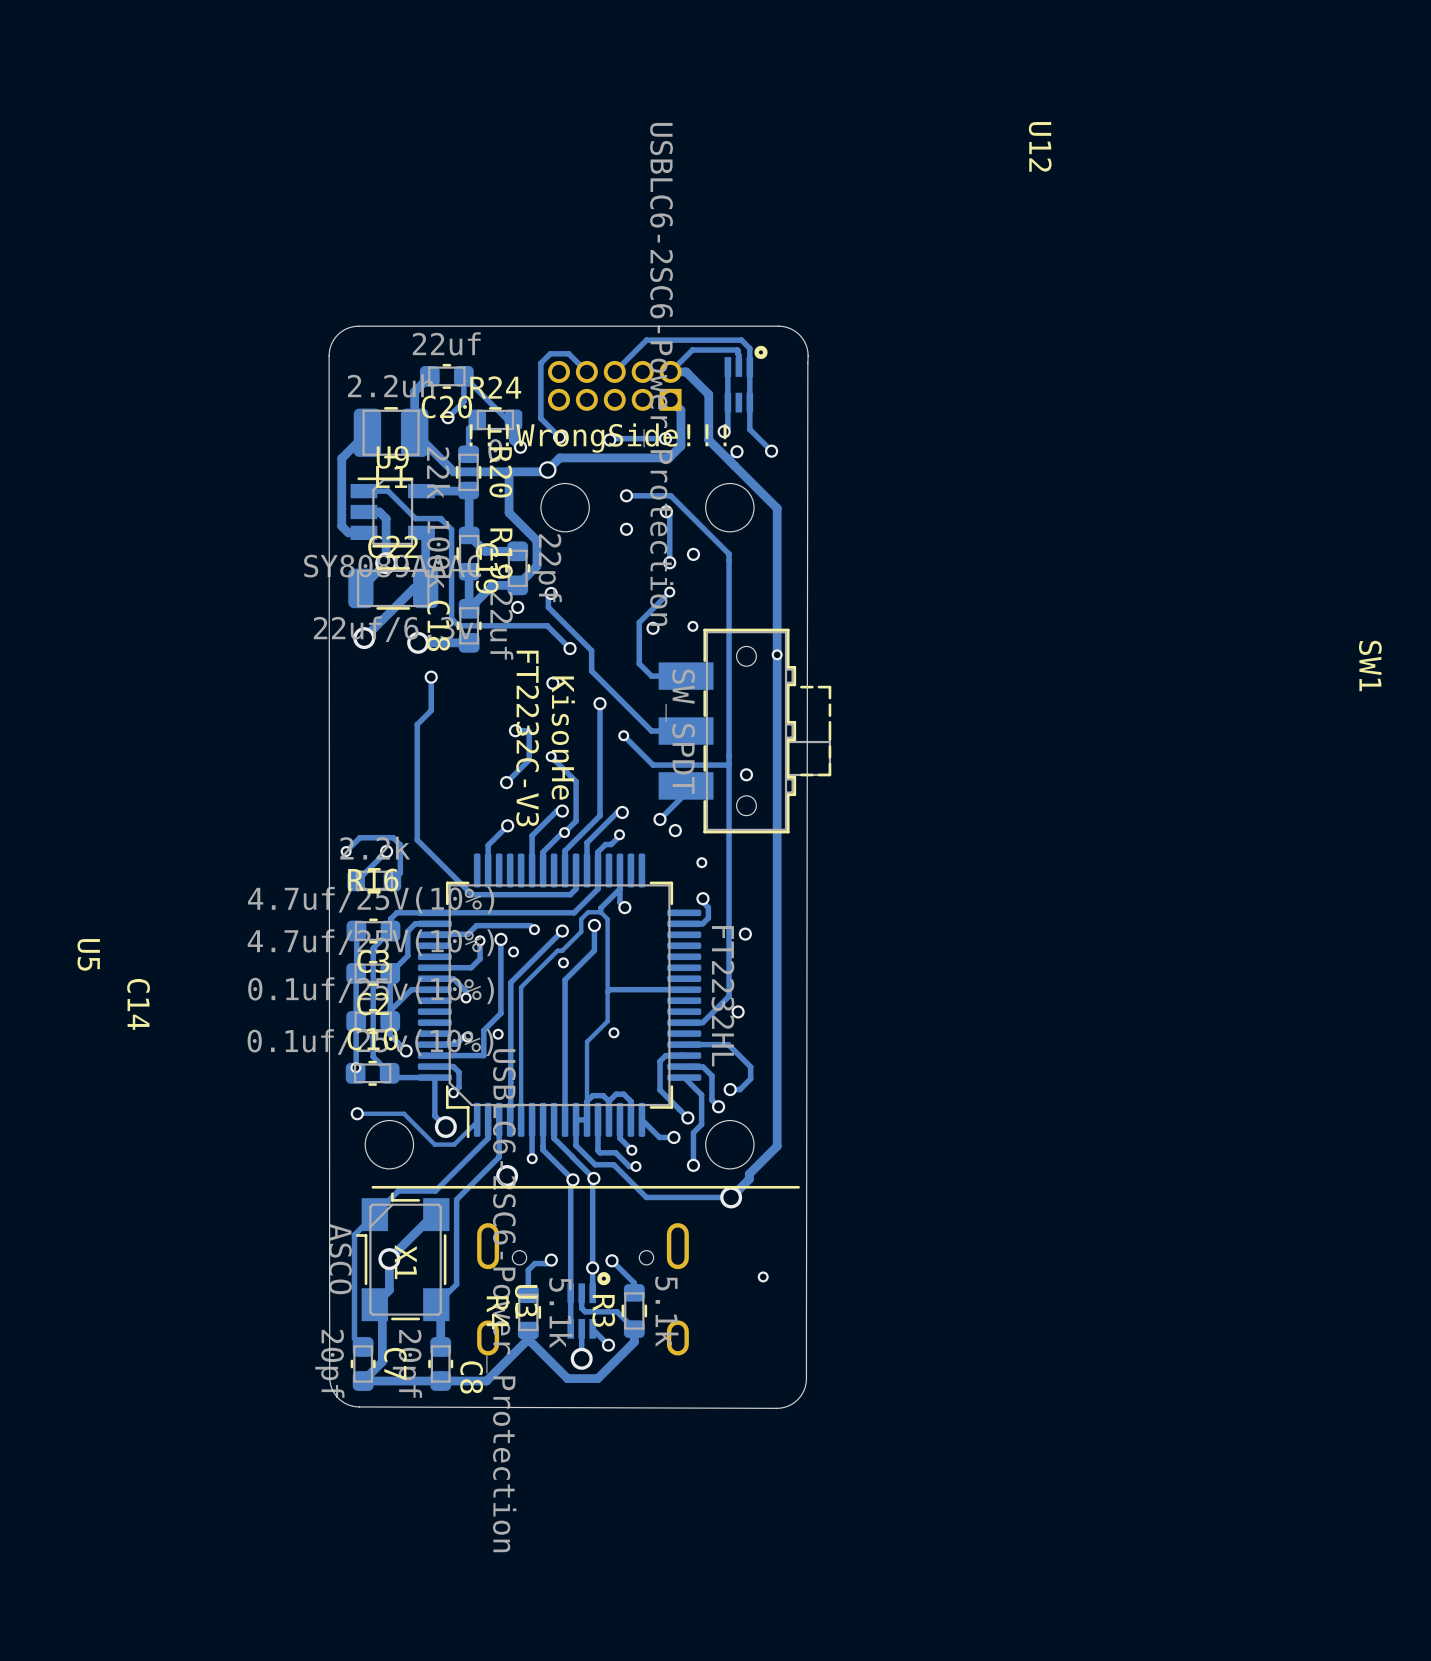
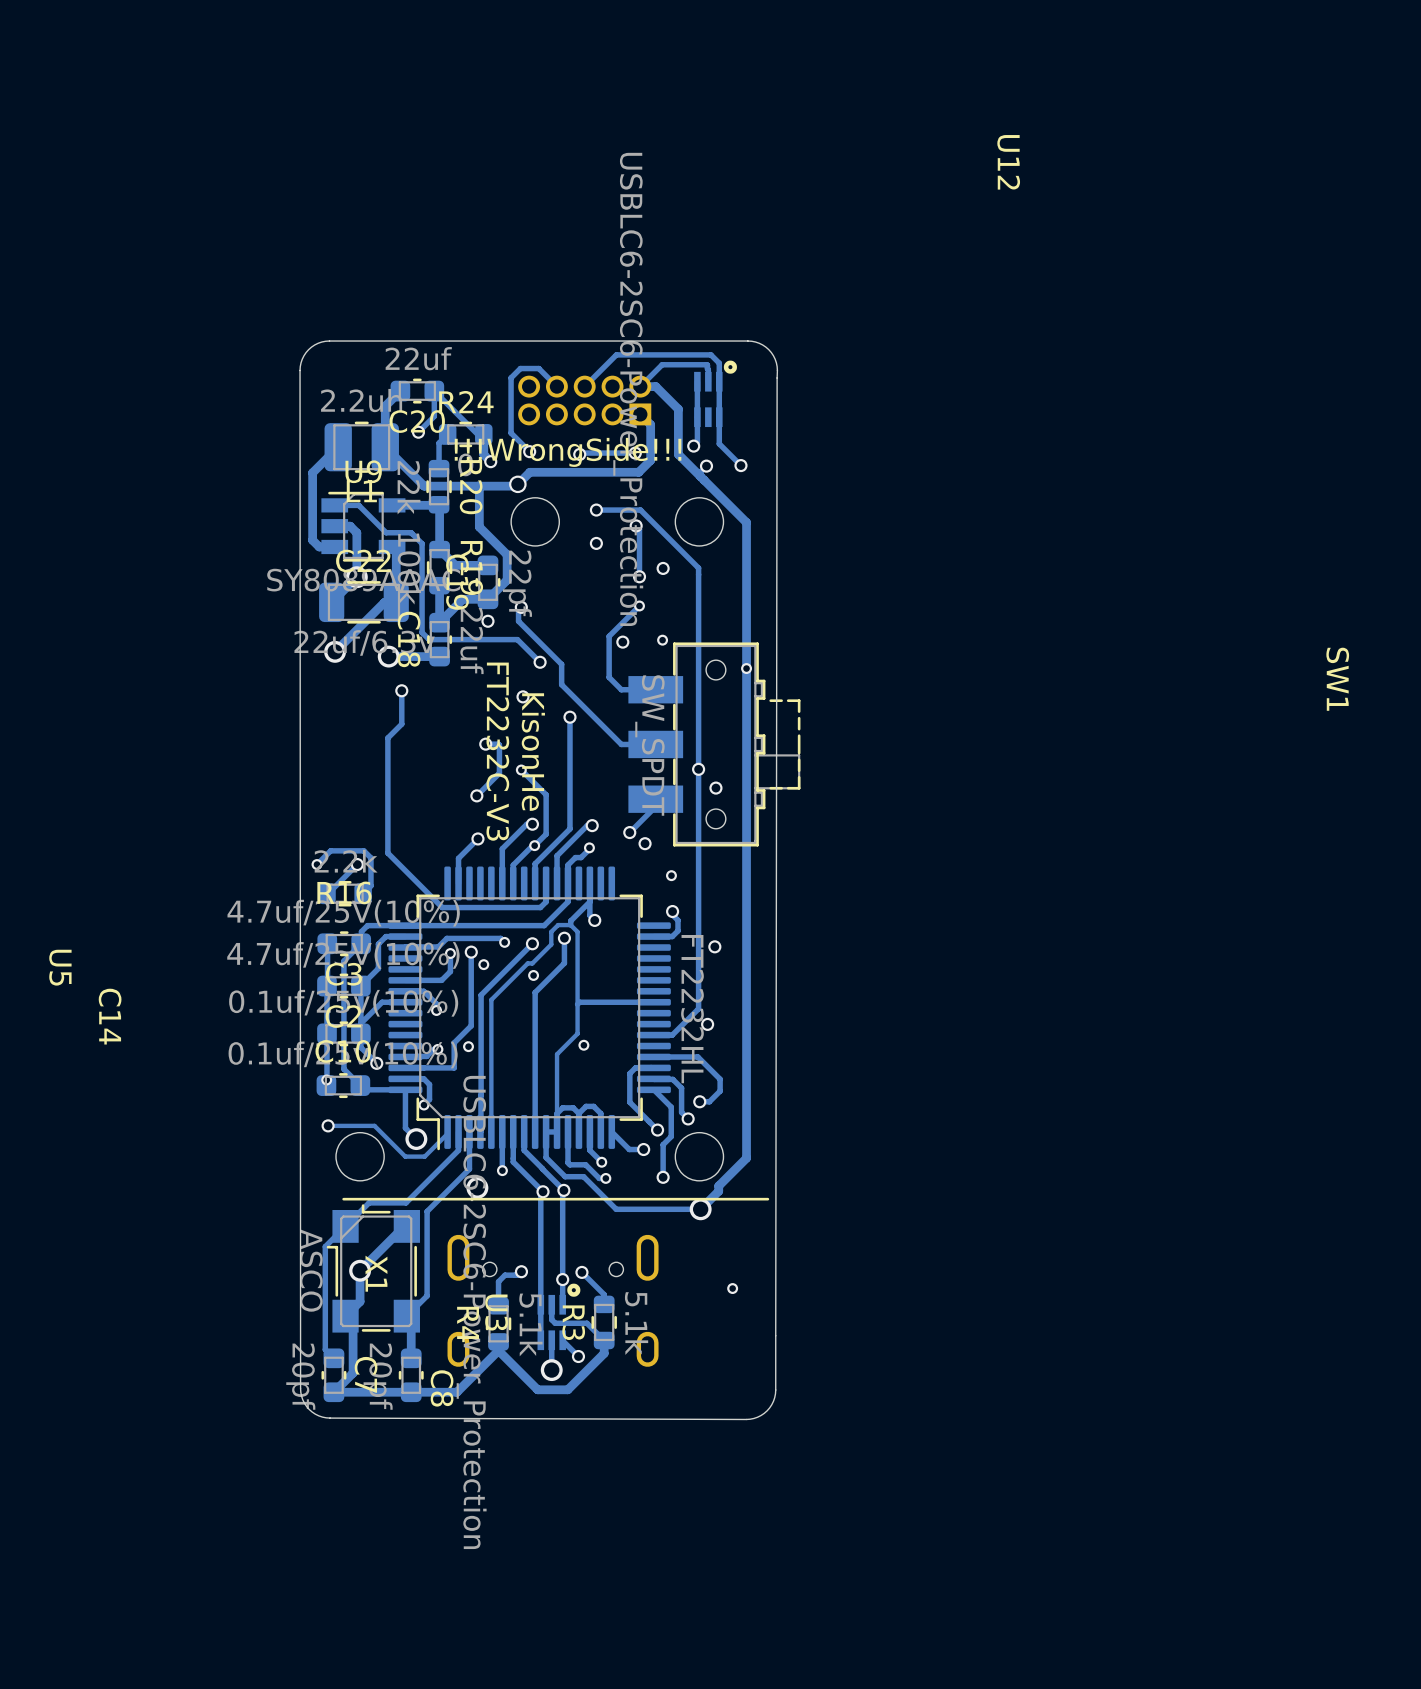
track: (623, 735) (653, 765) (729, 764) -> none
via: (623, 735) -> none
via: none -> (698, 769)

